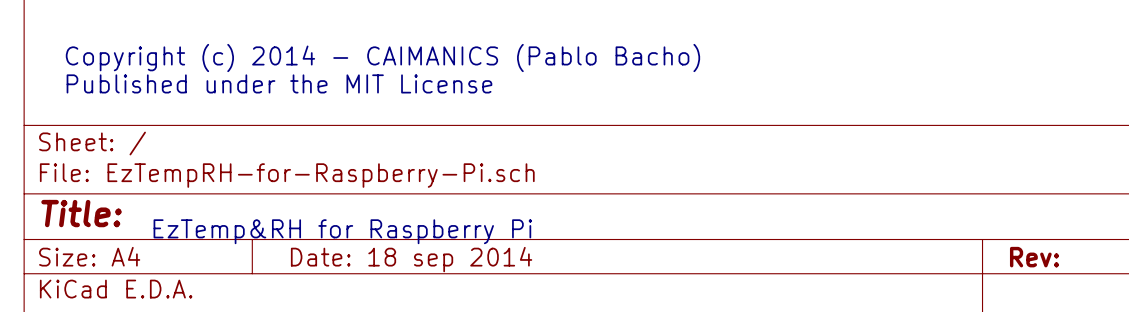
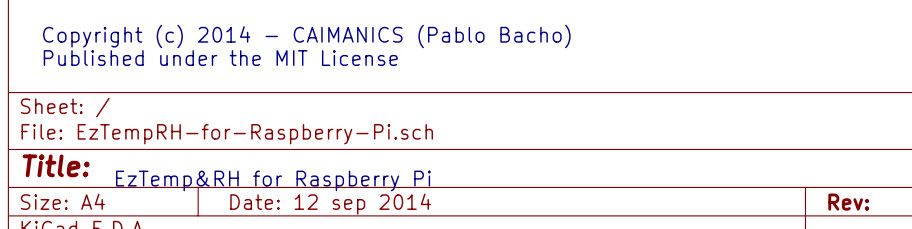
title block: Date: 18 sep 2014 (411, 259) -> Date: 12 sep 2014 (330, 204)

